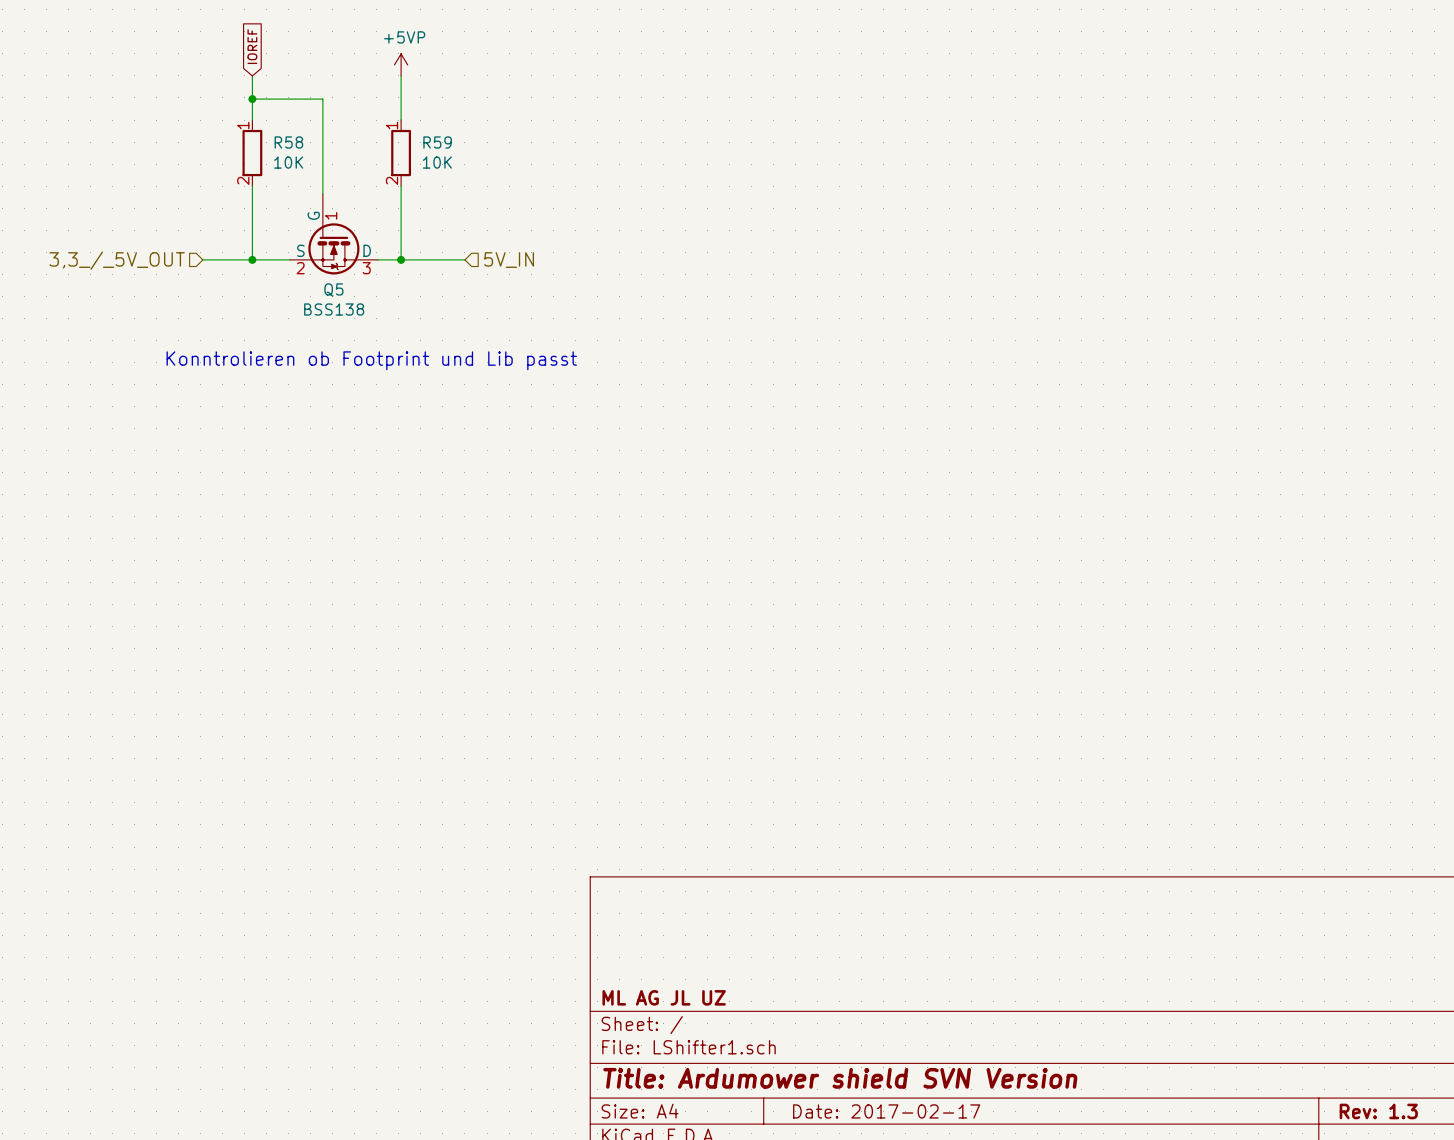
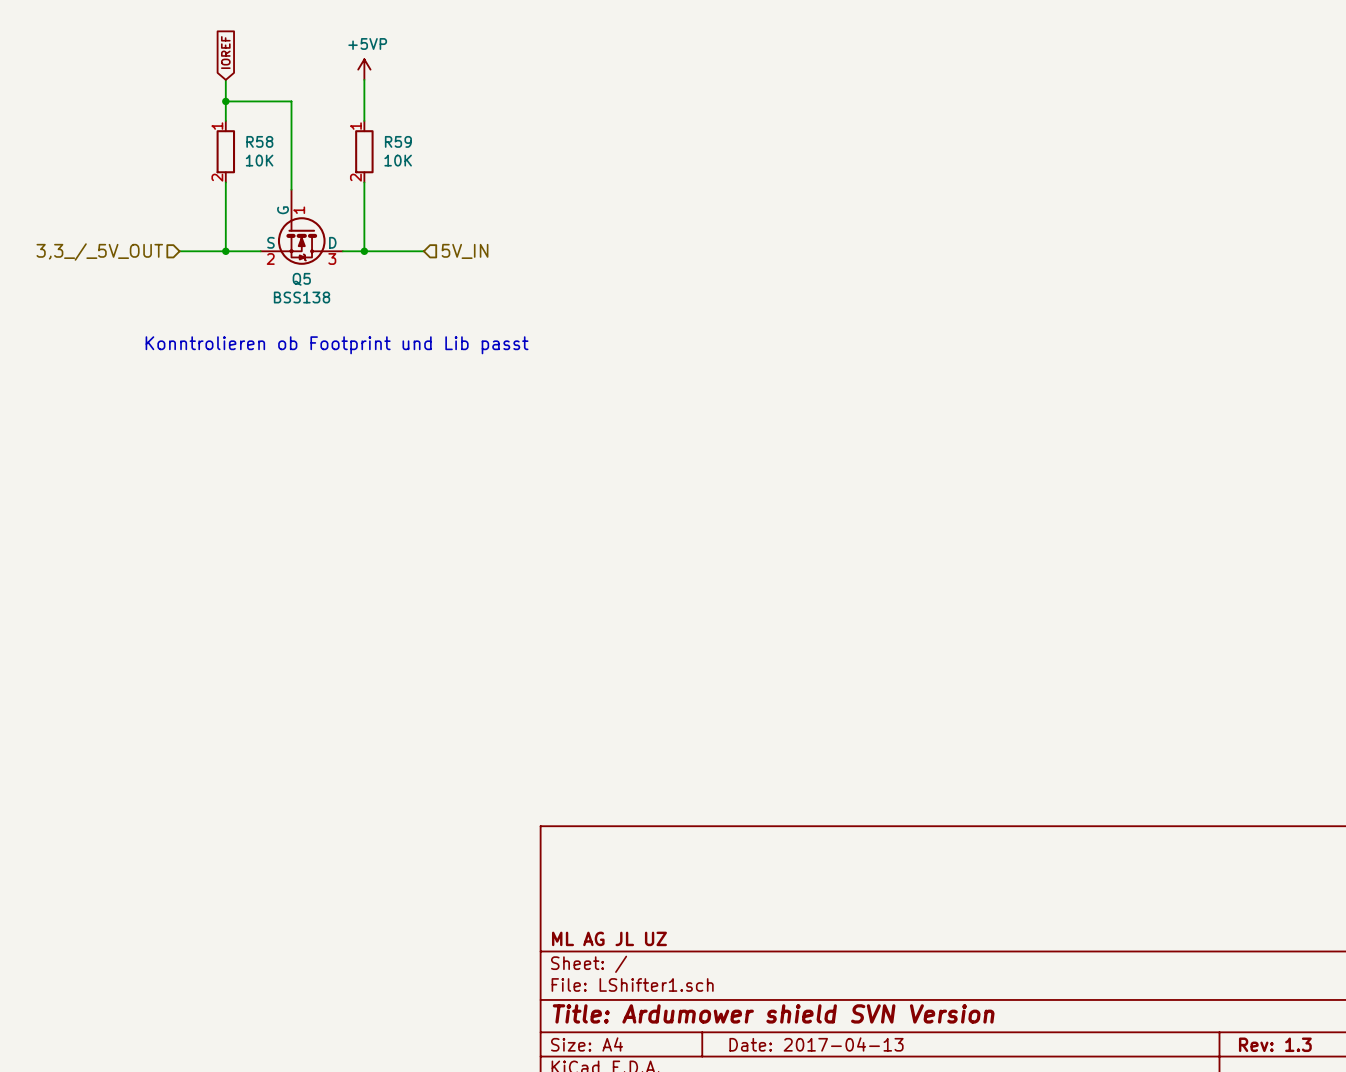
title block: Date: 2017-02-17 (886, 1111) -> Date: 2017-04-13 (816, 1044)

